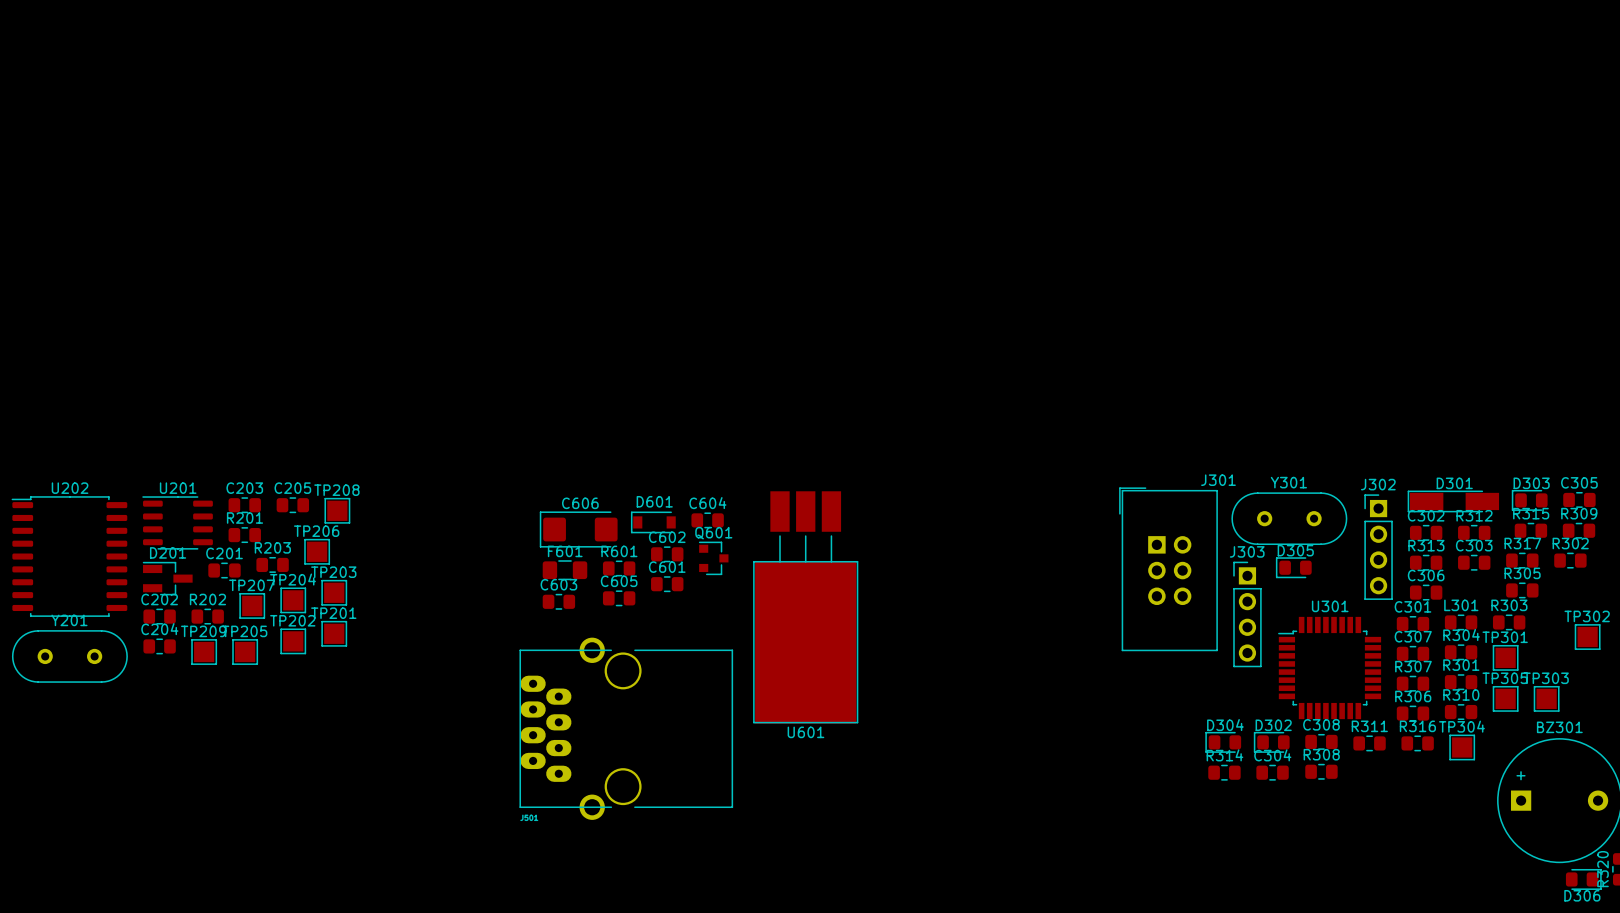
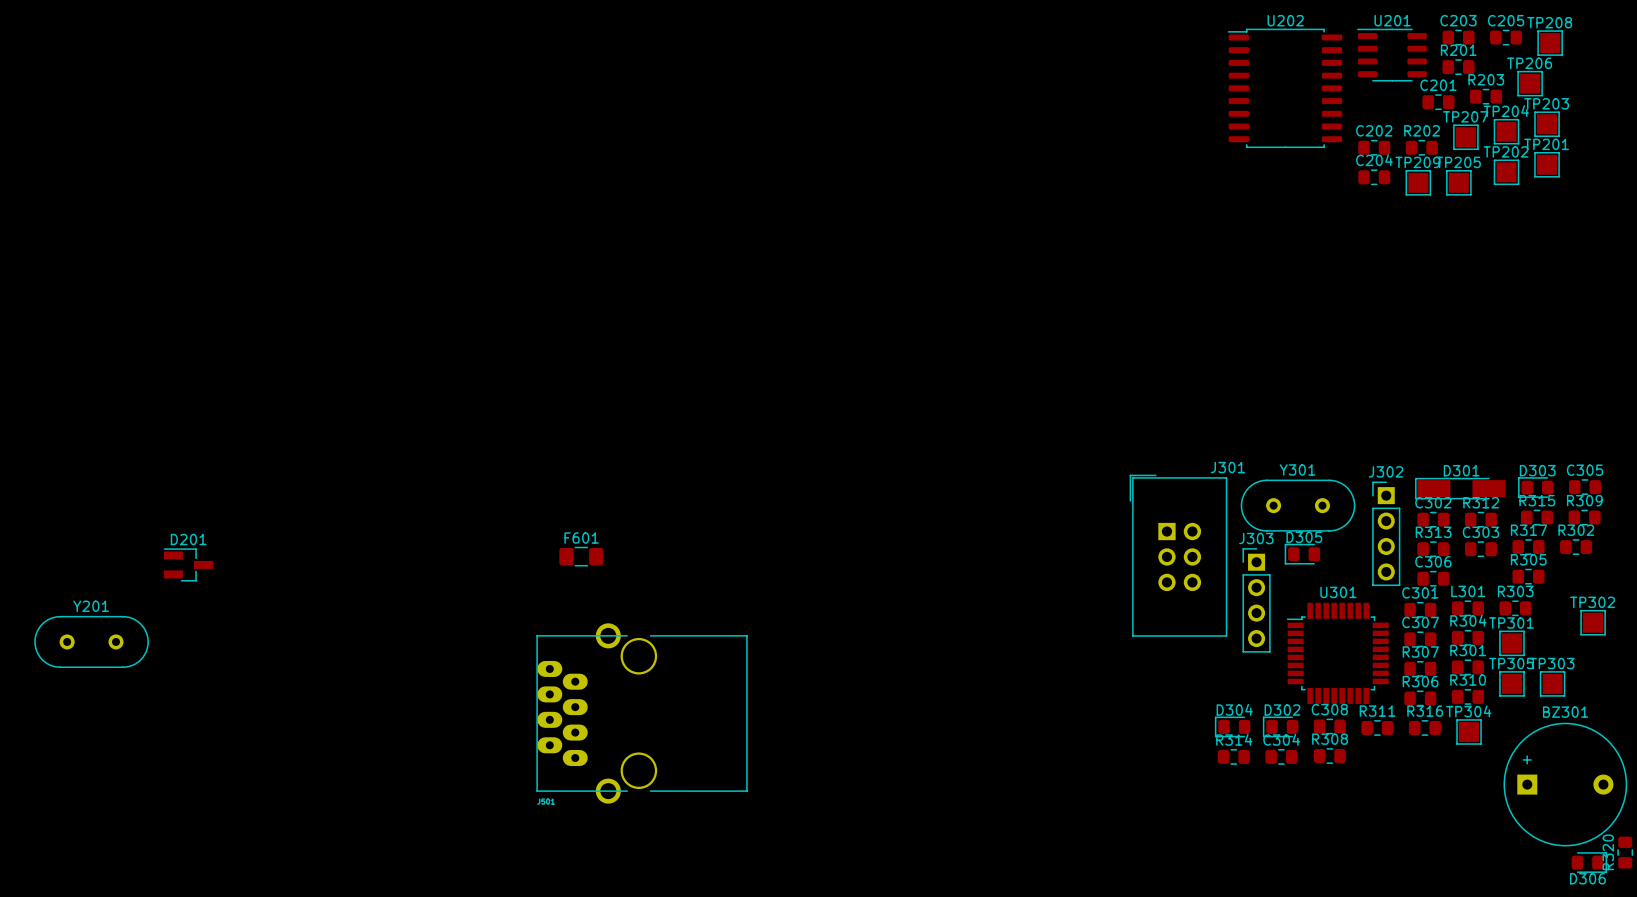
C203 position: (244, 505) -> (1458, 37)
C205 position: (292, 505) -> (1506, 37)
TP208 position: (337, 510) -> (1550, 43)
C604: (707, 520) -> none
U201 position: (177, 522) -> (1392, 55)
D601: (653, 522) -> none
C606: (578, 529) -> none
R201 position: (244, 535) -> (1458, 67)
TP206 position: (317, 551) -> (1530, 83)
C602: (667, 554) -> none
U202 position: (69, 556) -> (1285, 88)
Q601: (713, 558) -> none
R203 position: (272, 564) -> (1486, 96)
R601: (619, 568) -> none
C201 position: (224, 570) -> (1438, 102)
C601: (667, 584) -> none
TP203 position: (334, 592) -> (1547, 124)
C605: (619, 598) -> none
TP204 position: (293, 600) -> (1506, 131)
C603: (558, 601) -> none
TP207 position: (252, 605) -> (1465, 137)
U601: (805, 607) -> none
C202 position: (159, 616) -> (1374, 147)
R202 position: (207, 616) -> (1421, 147)
TP201 position: (334, 633) -> (1547, 164)
TP202 position: (293, 641) -> (1506, 172)
C204 position: (159, 646) -> (1374, 177)
TP209 position: (204, 652) -> (1418, 182)
TP205 position: (245, 652) -> (1458, 182)

